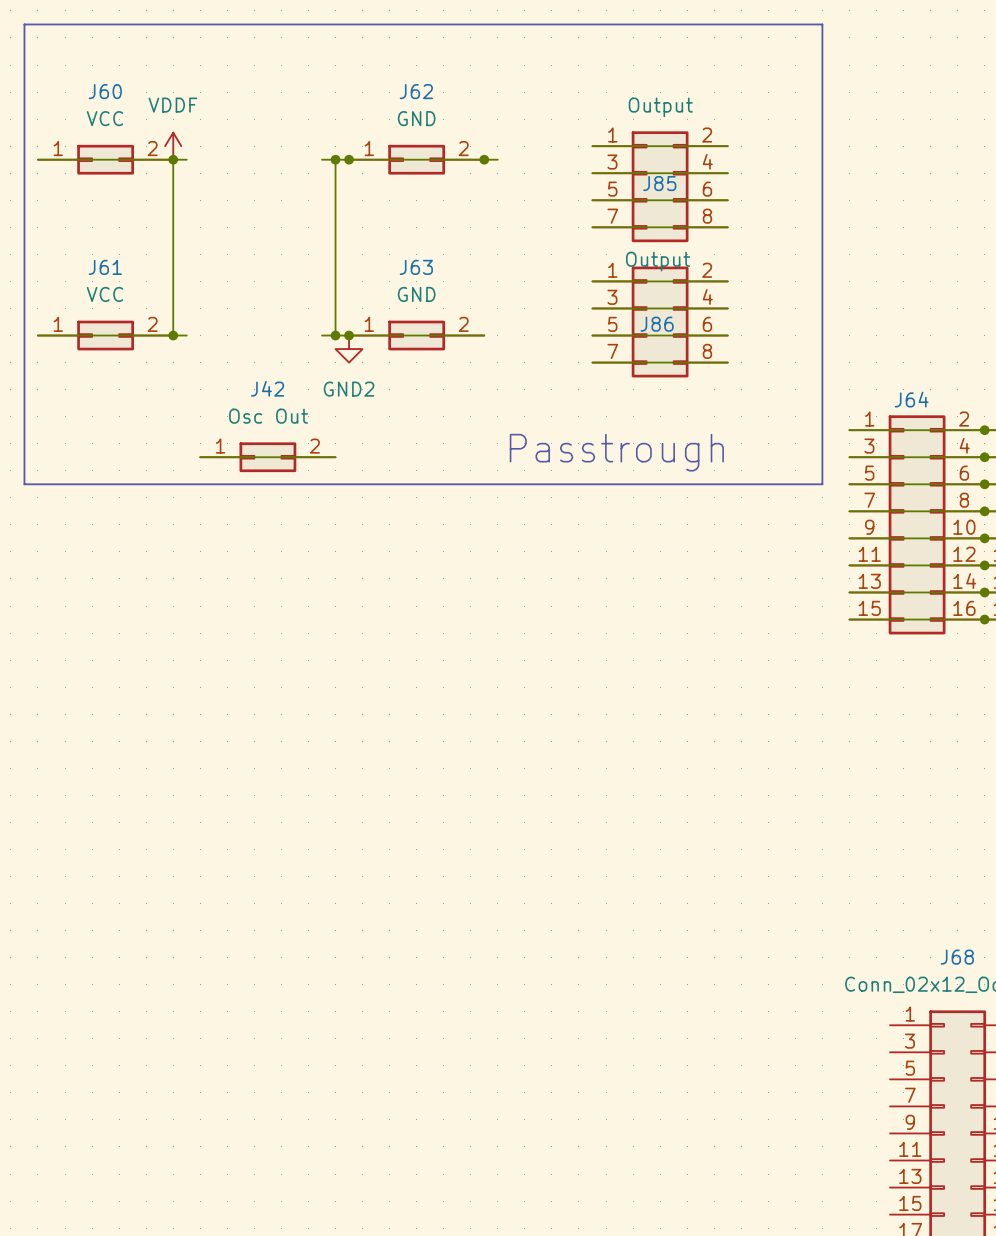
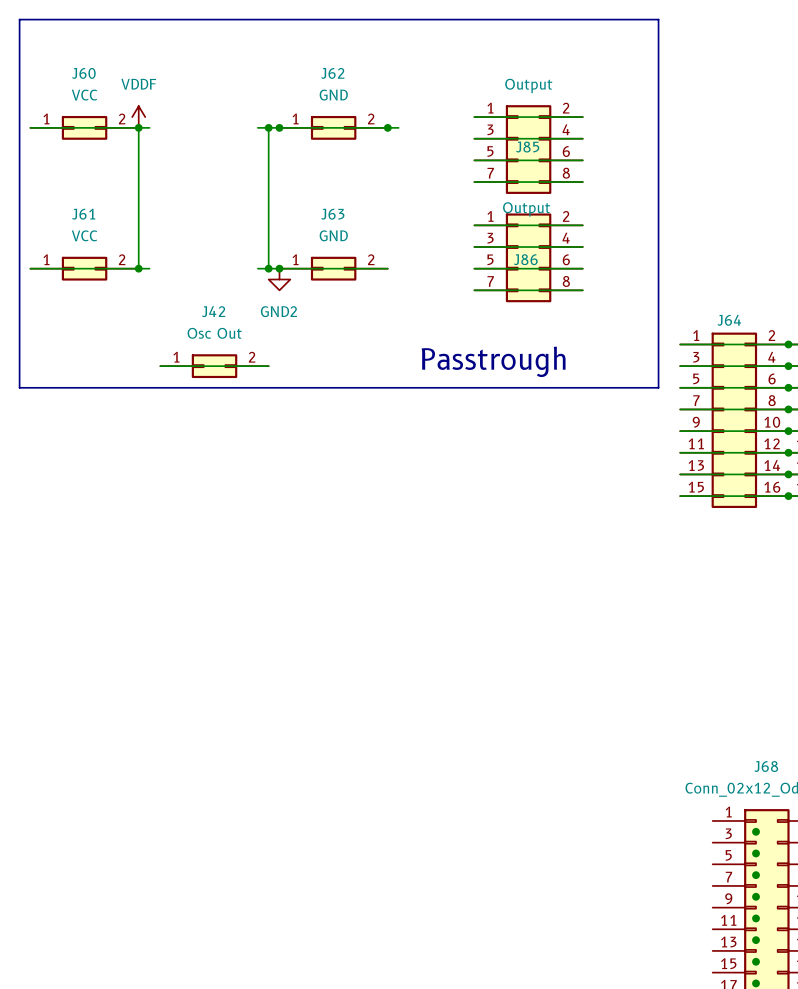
junction: none -> (756, 831)
junction: none -> (756, 853)
junction: none -> (756, 875)
junction: none -> (756, 896)
junction: none -> (756, 918)
junction: none -> (756, 940)
junction: none -> (756, 961)
junction: none -> (756, 983)

